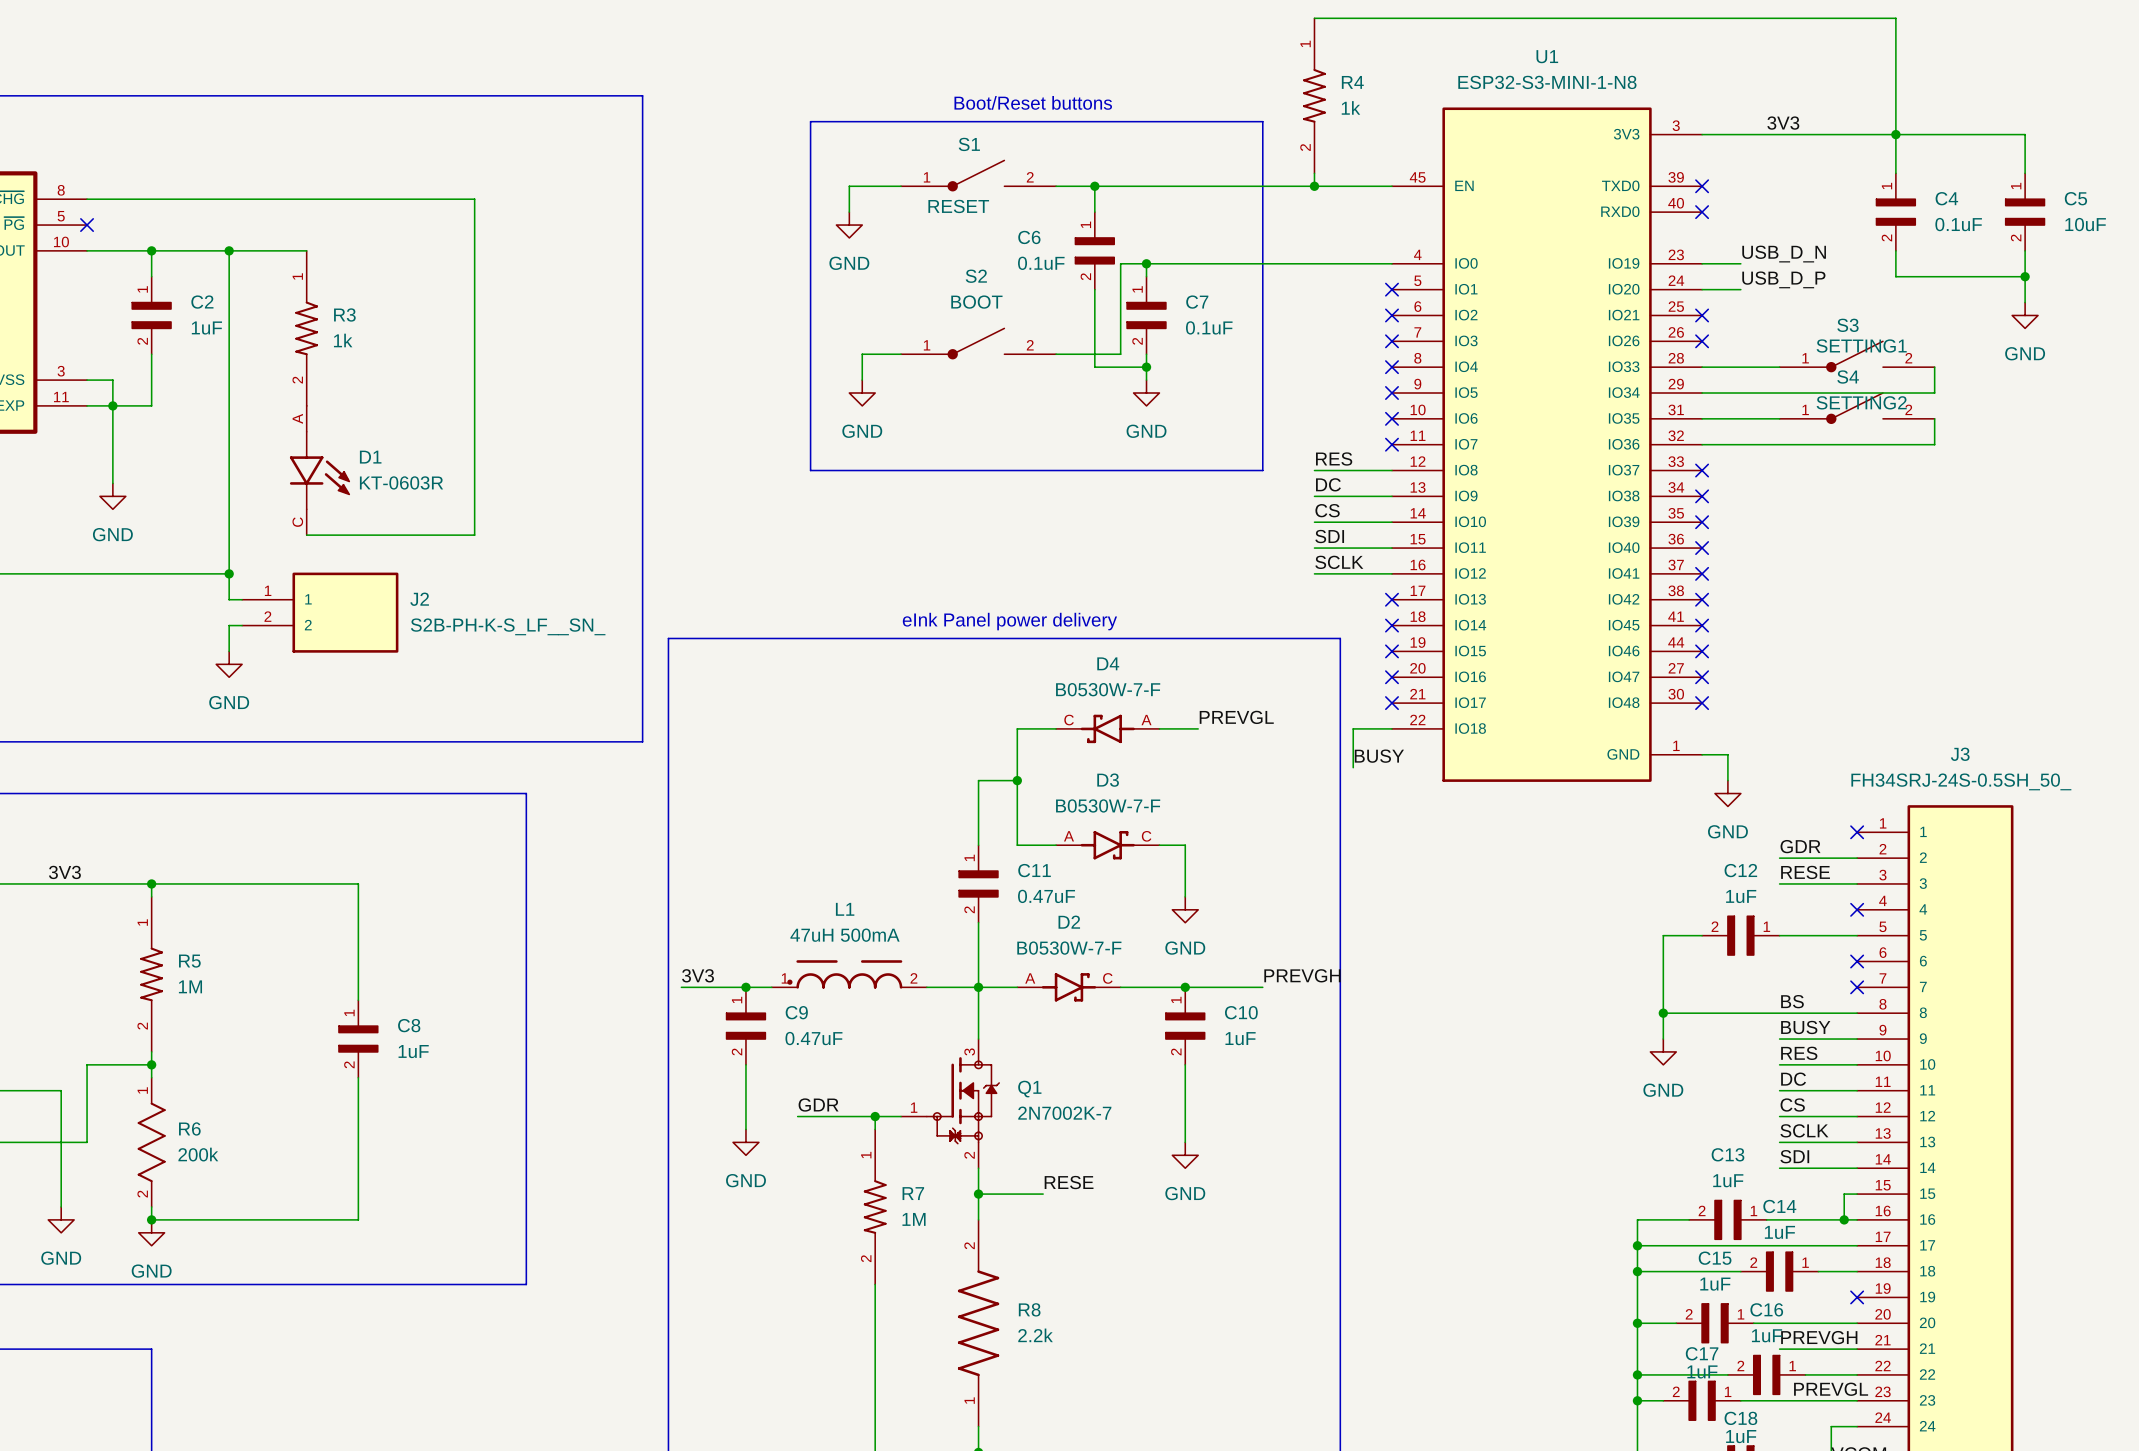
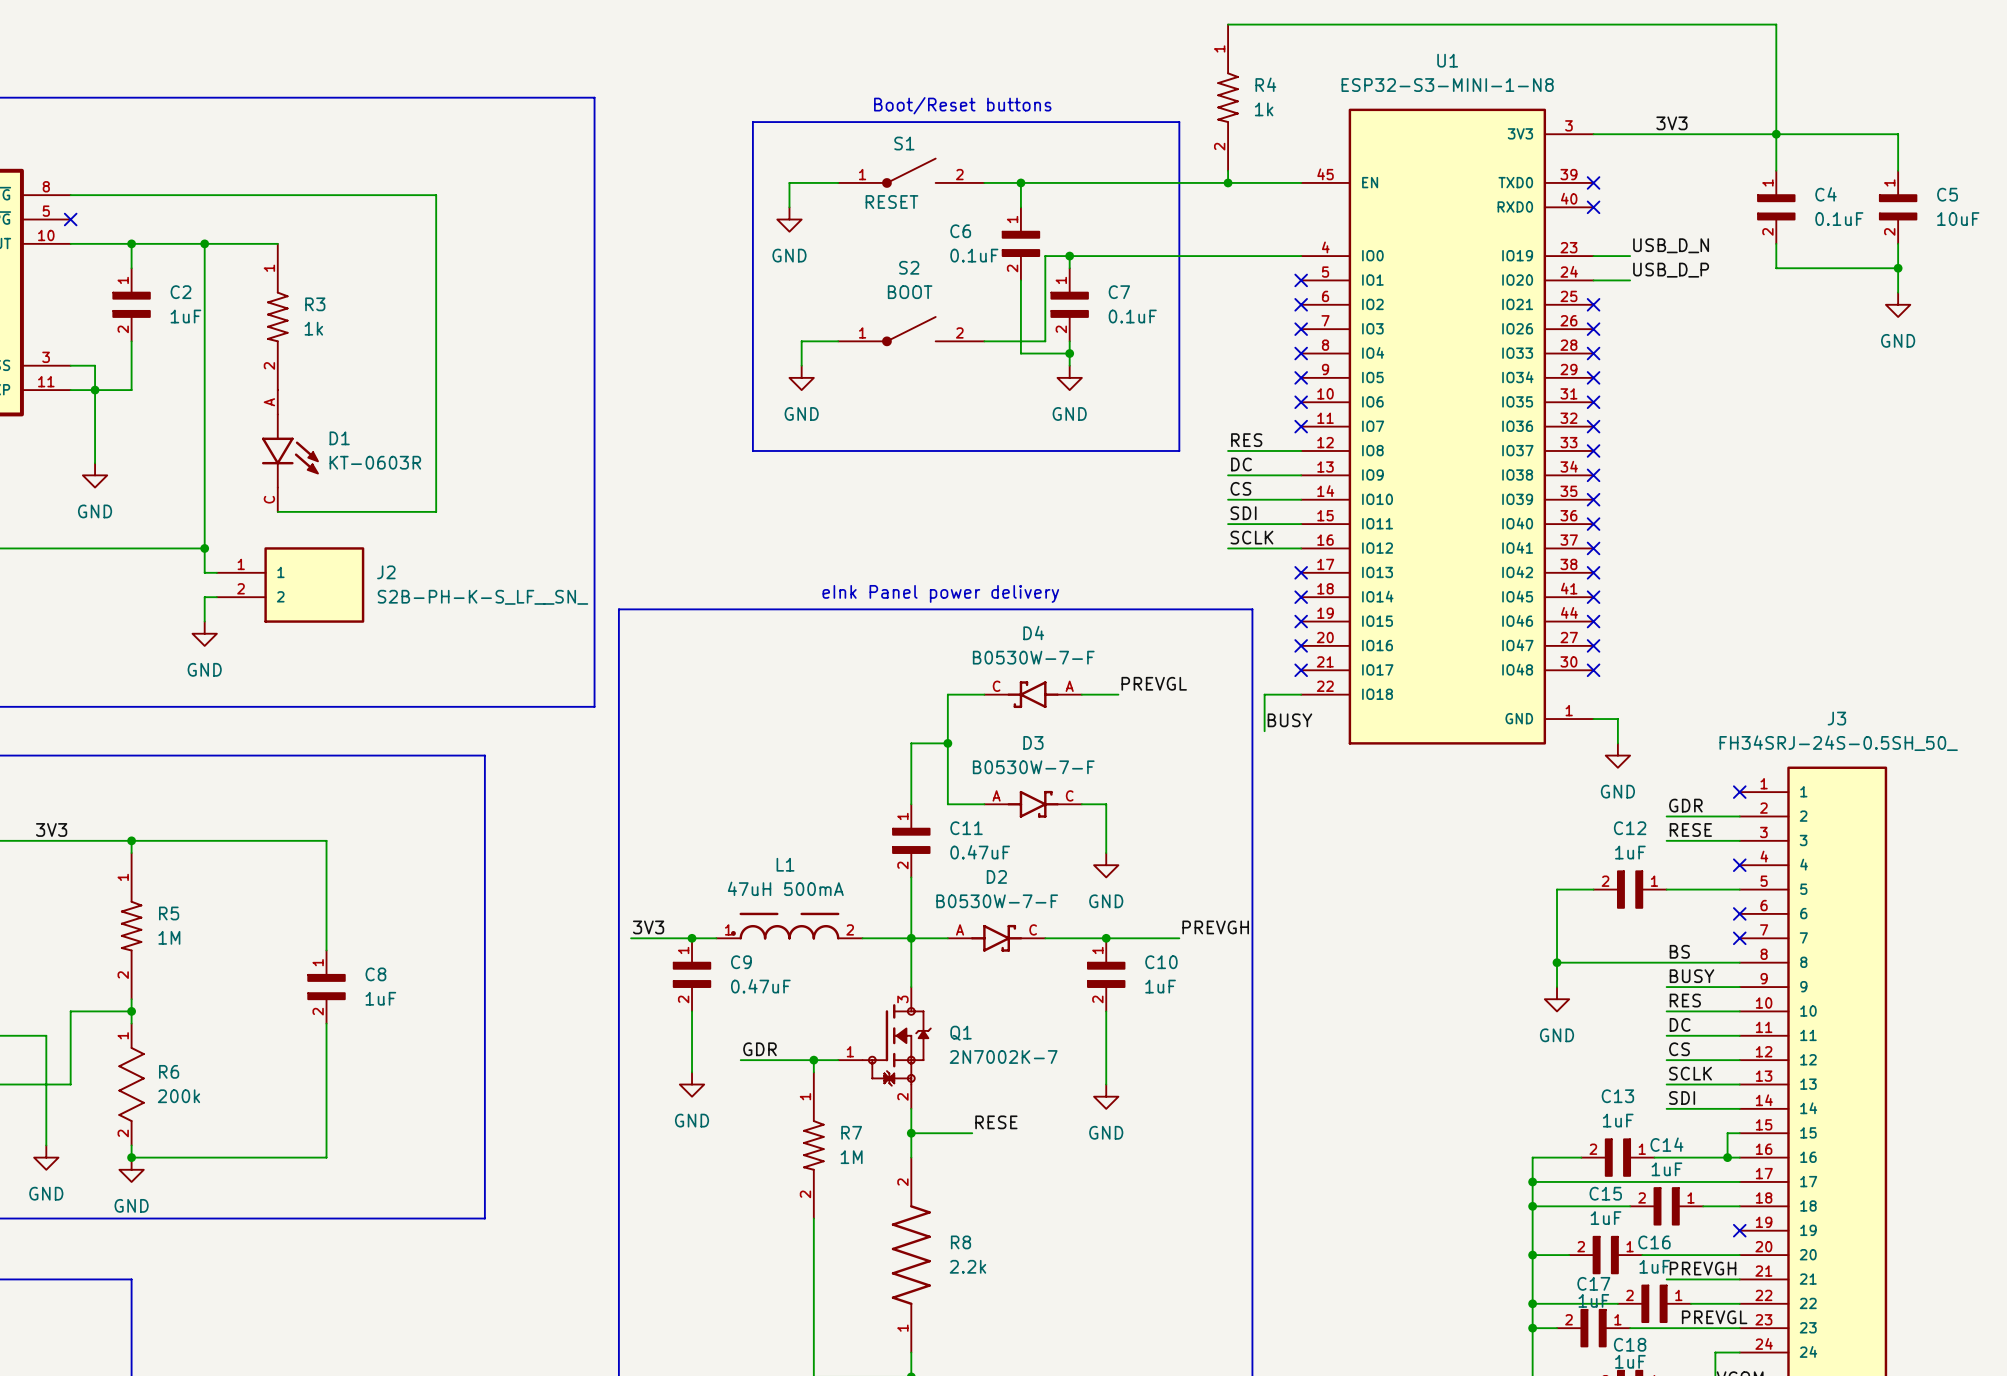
S3: SETTING1 (1857, 356) -> none
wire: (1702, 367) (1779, 367) -> none
no-connect mark: none -> (1593, 353)
wire: (1934, 367) (1934, 393) (1702, 393) -> none
no-connect mark: none -> (1593, 377)
S4: SETTING2 (1857, 408) -> none
wire: (1702, 418) (1779, 418) -> none
no-connect mark: none -> (1593, 402)
wire: (1934, 418) (1934, 444) (1702, 444) -> none
no-connect mark: none -> (1593, 426)

